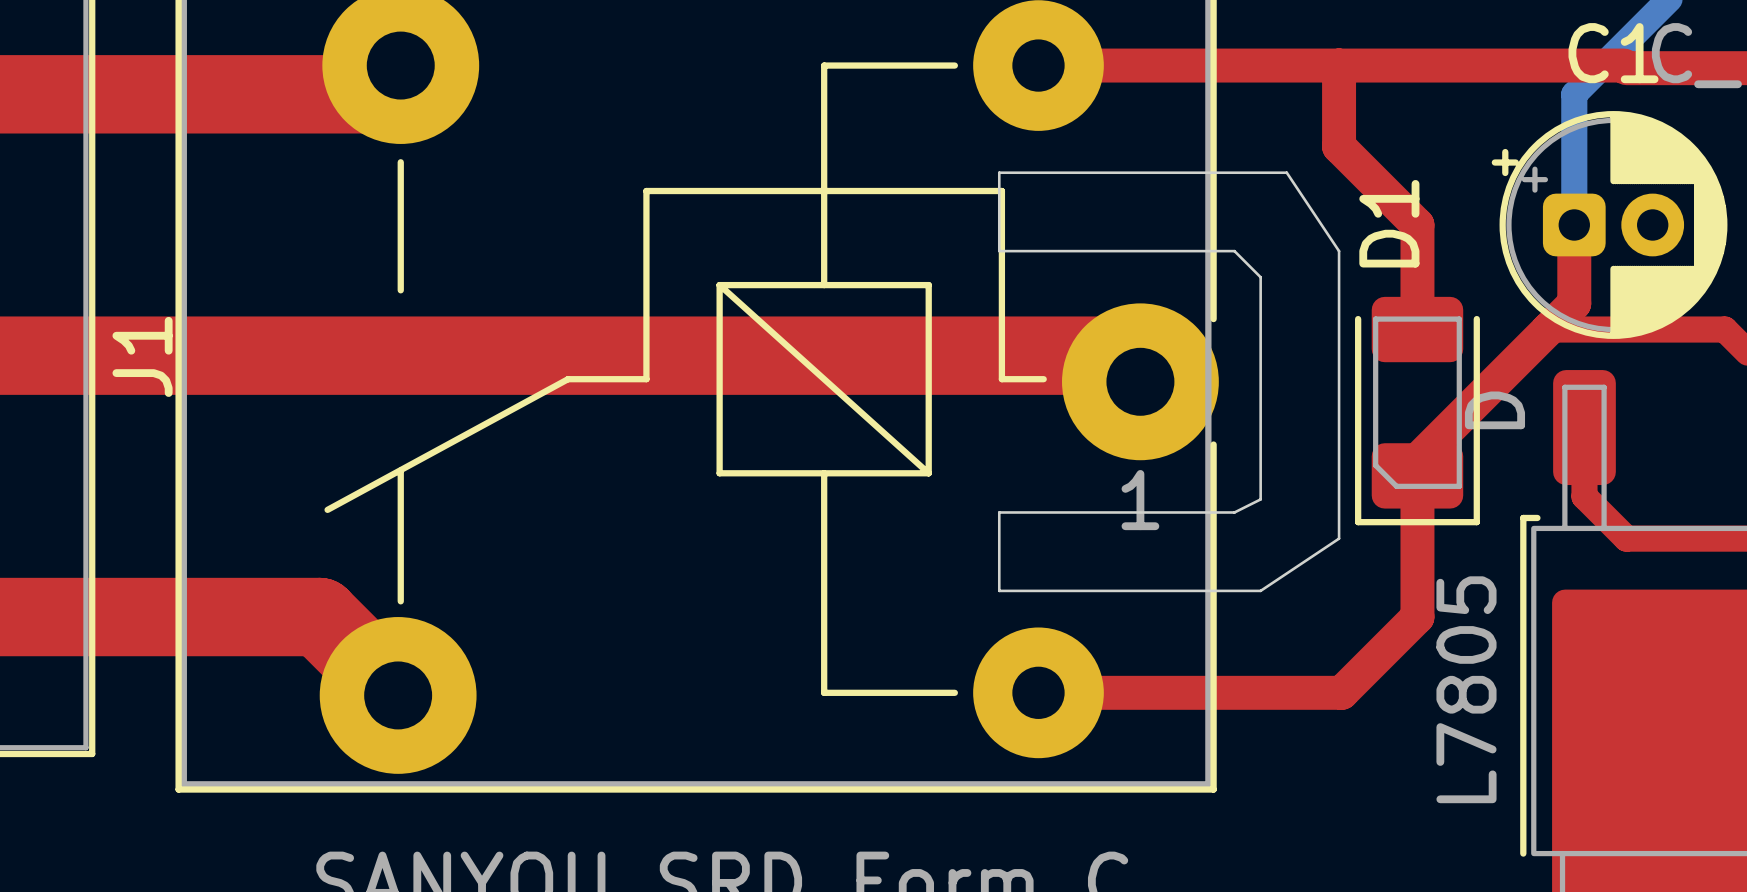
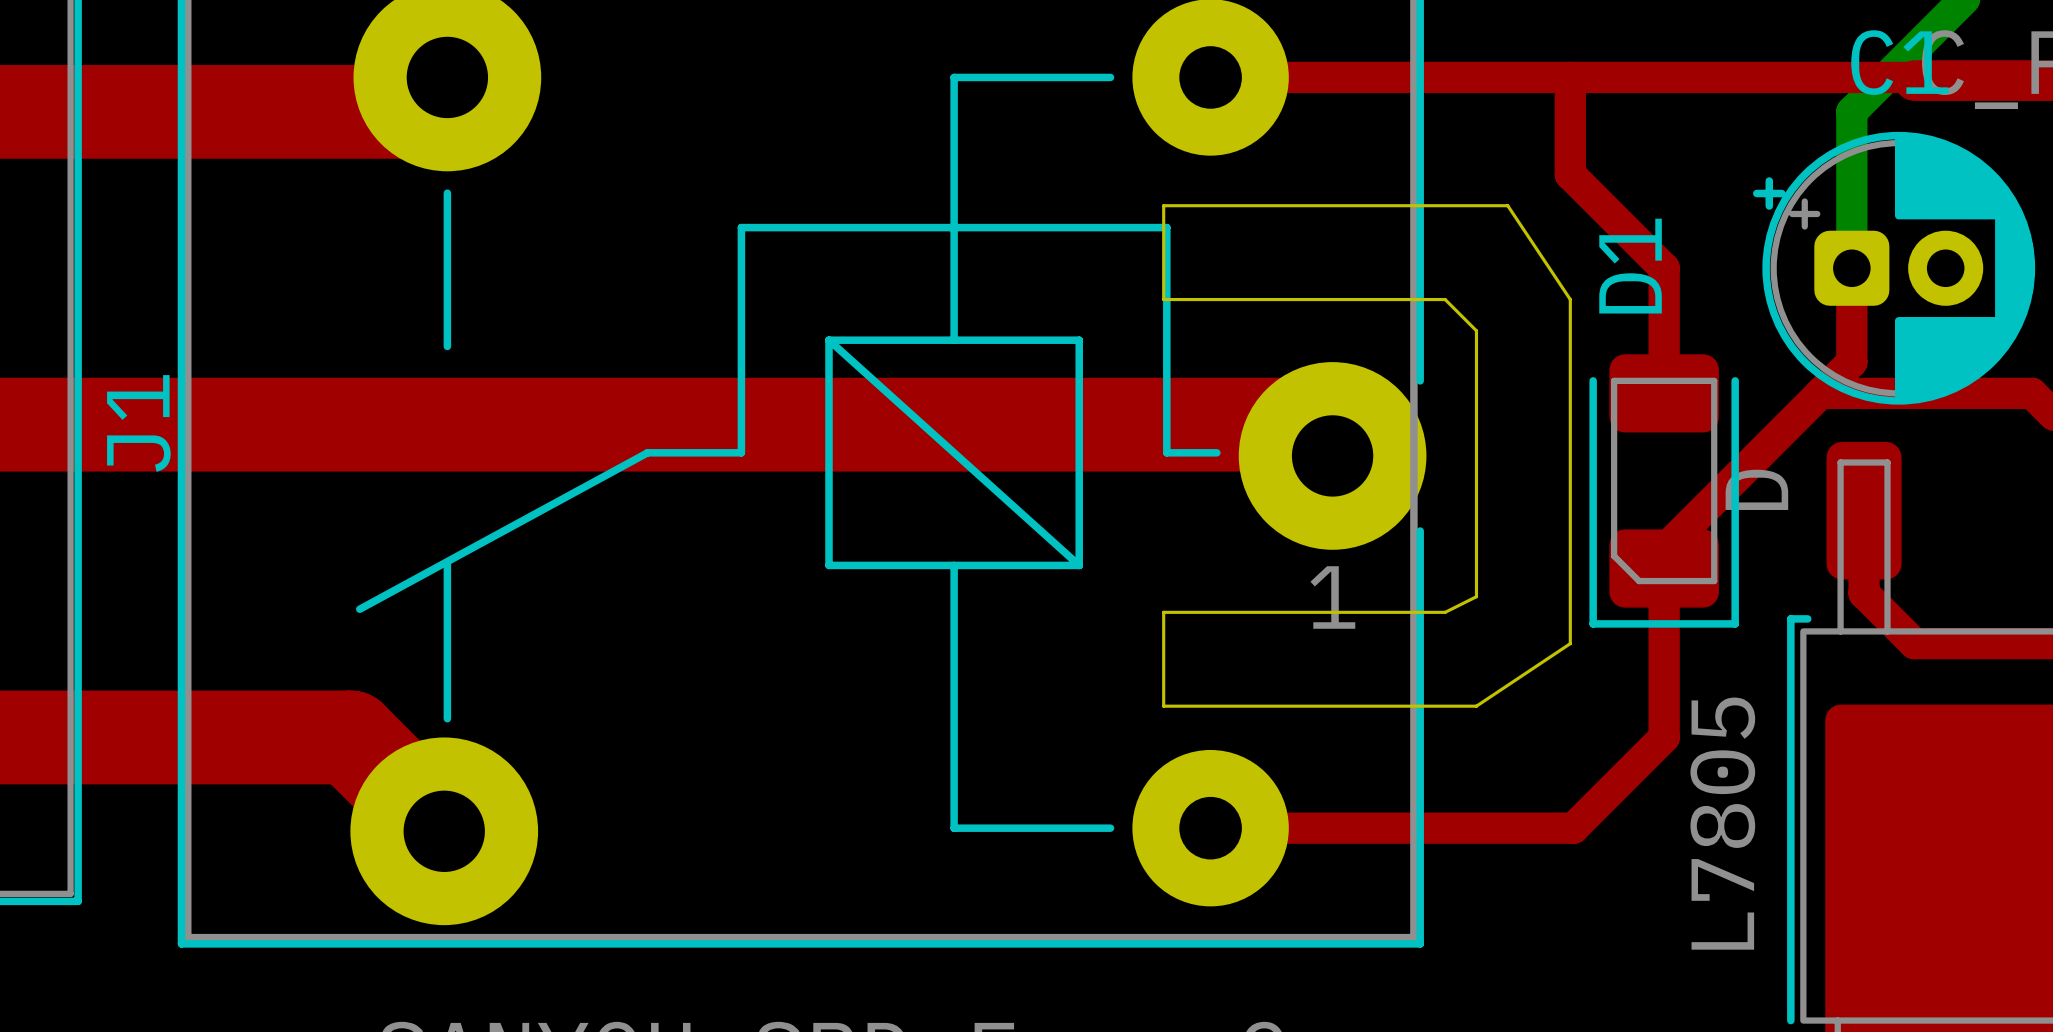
top track width: thick (1038, 65) (1623, 65) -> thin (1210, 77) (1911, 77)
top track width: thick (1339, 65) (1339, 146) (1417, 224) (1417, 329) -> thin (1570, 77) (1570, 174) (1664, 268) (1664, 393)
top track width: thick (1574, 224) (1574, 303) (1417, 460) -> thin (1851, 268) (1851, 362) (1664, 549)
top track width: thick (1417, 475) (1417, 617) (1341, 692) (1038, 692) -> thin (1664, 568) (1664, 737) (1573, 828) (1210, 828)

